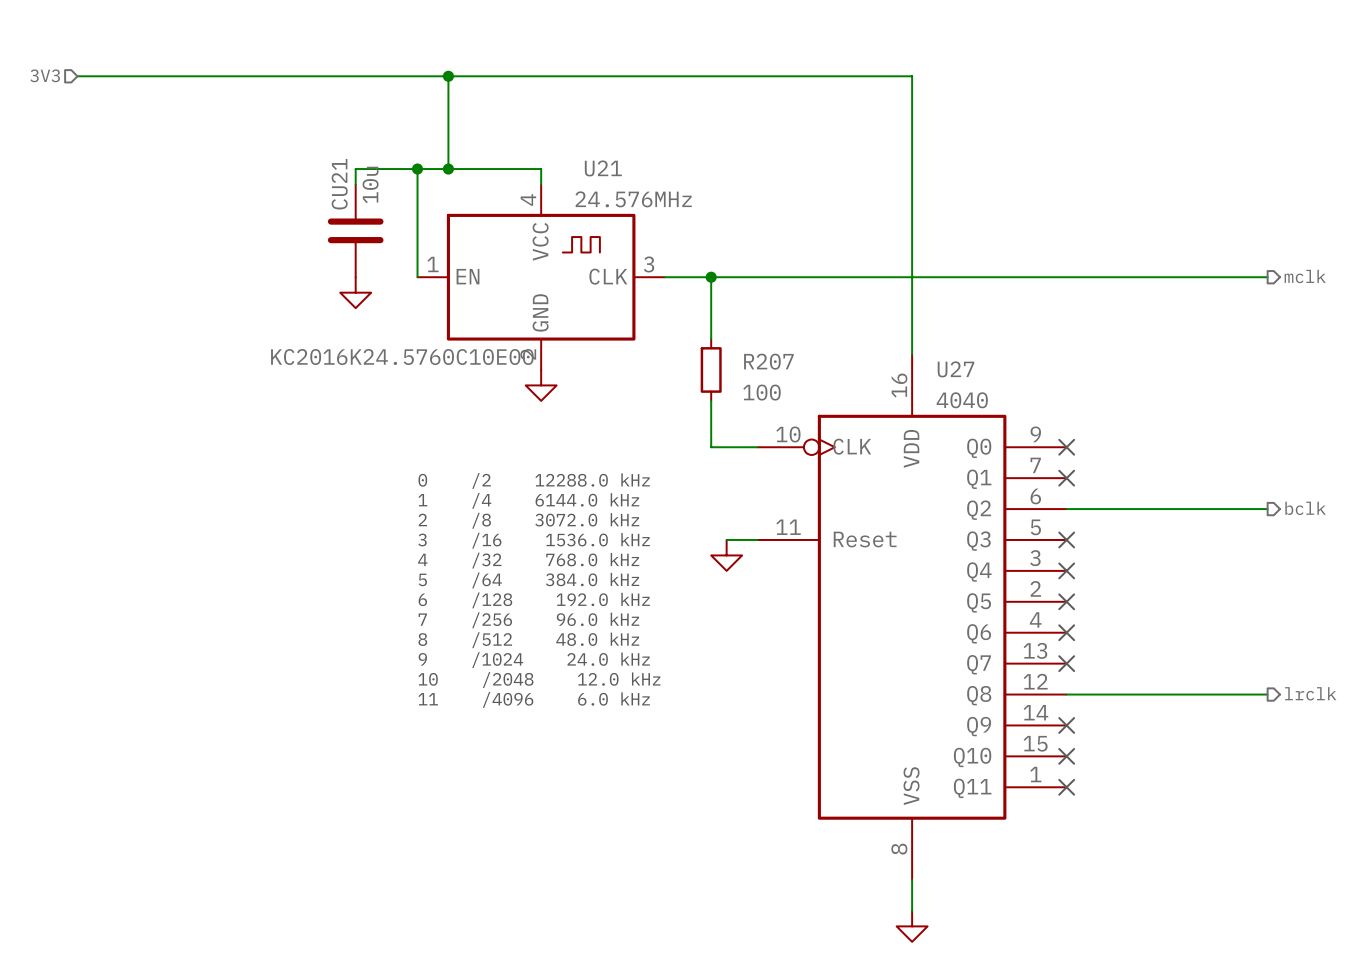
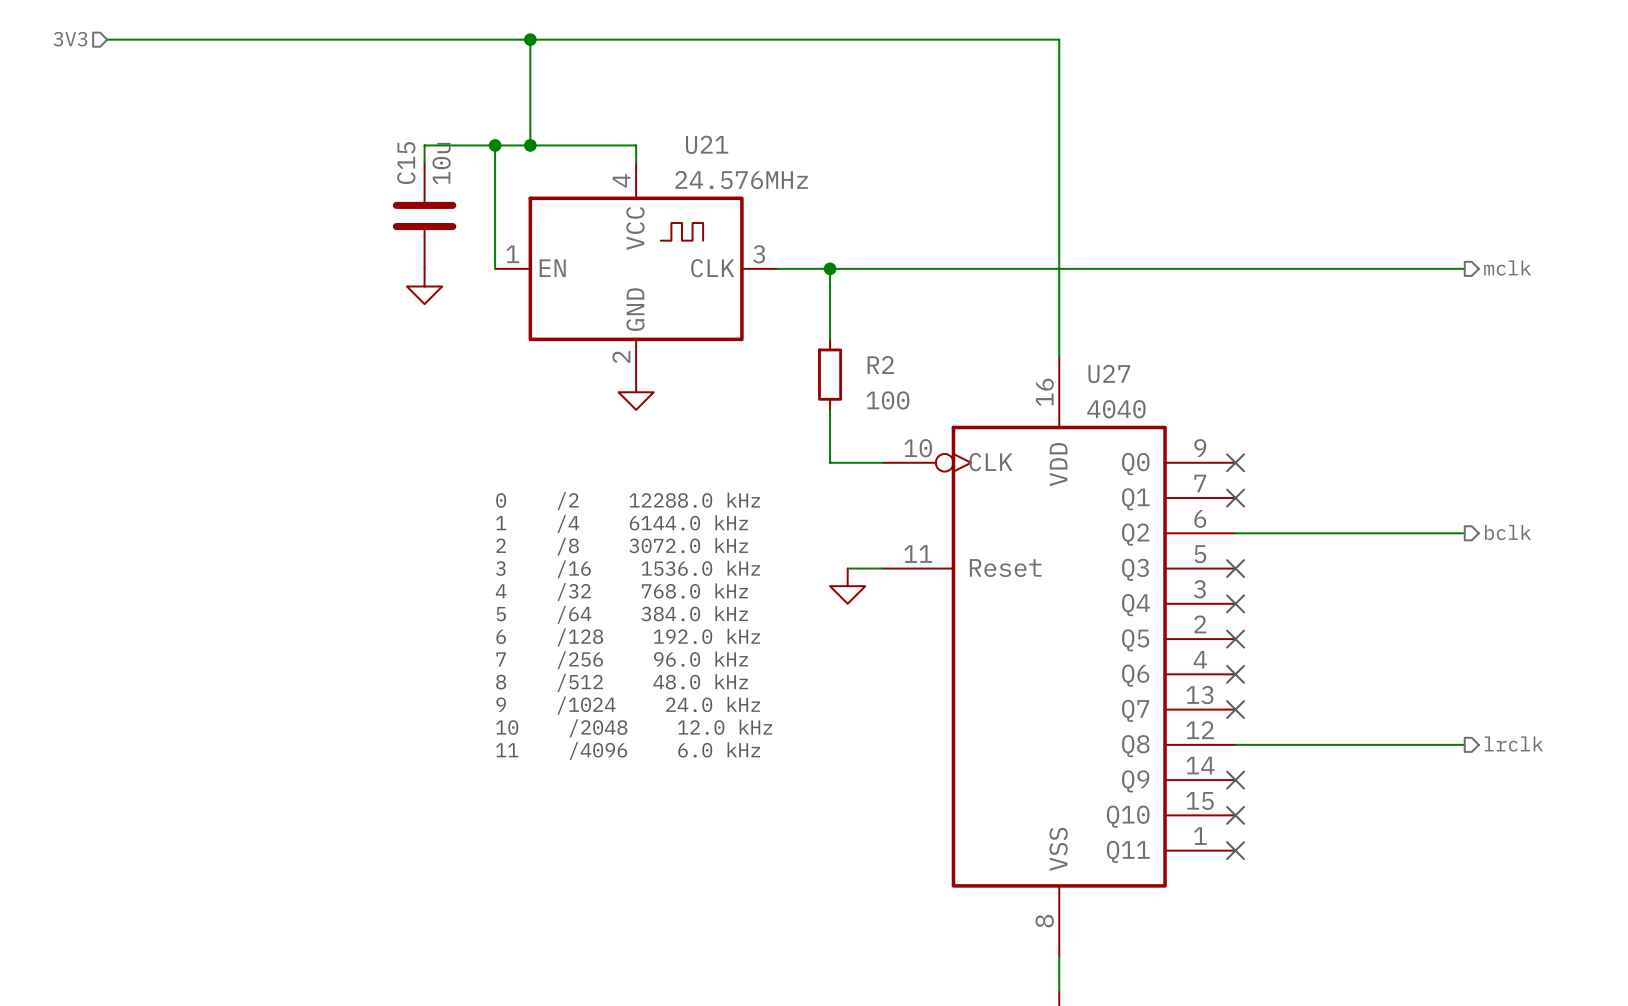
CU21 name: CU21 (339, 184) -> C15 (406, 163)
U21 text: KC2016K24.5760C10E00 (402, 357) -> none
R207 name: R207 (768, 361) -> R2 (880, 365)

